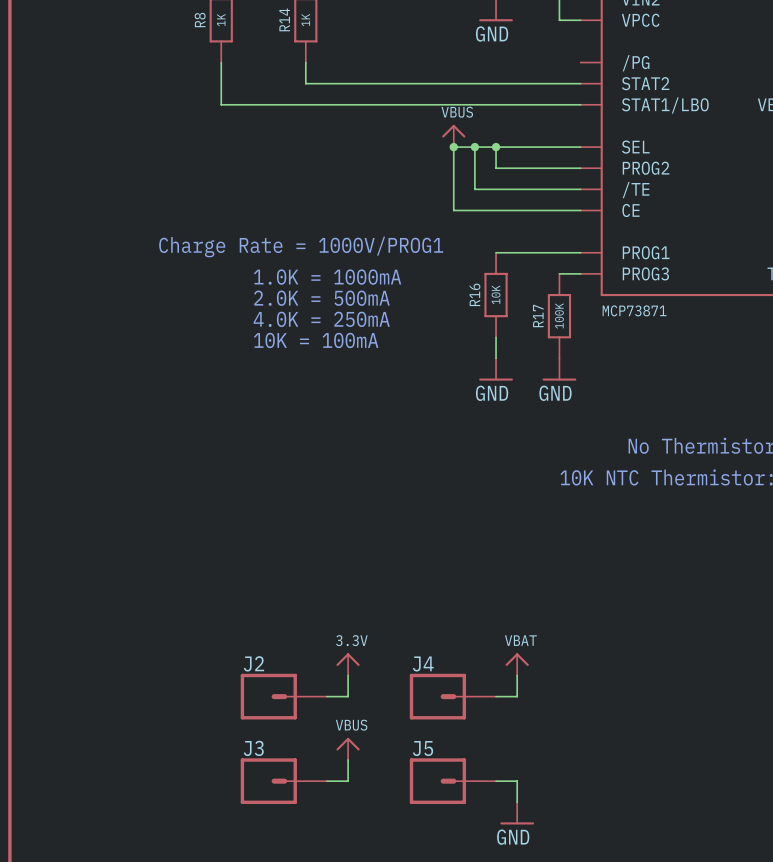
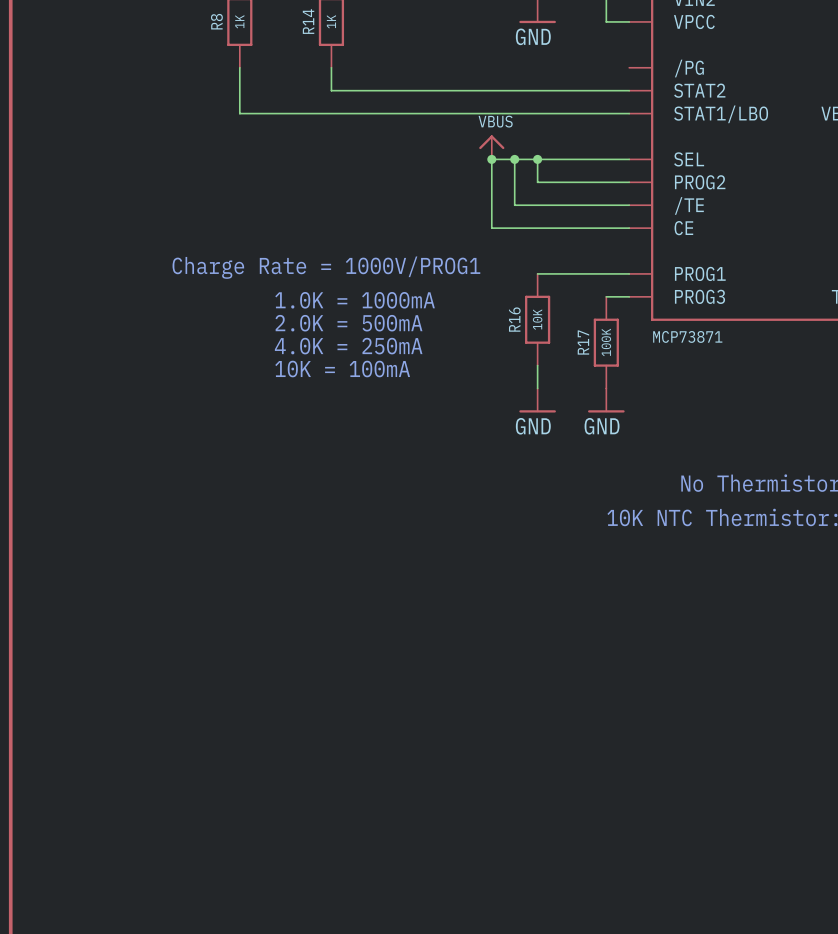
power symbol: 3.3V (348, 664) -> none
power symbol: VBAT (517, 664) -> none
wire: (348, 675) (348, 696) (326, 696) -> none
wire: (517, 675) (517, 696) (496, 696) -> none
J2: (283, 696) -> none
J4: (452, 696) -> none
power symbol: VBUS (348, 748) -> none
wire: (348, 760) (348, 781) (326, 781) -> none
J3: (283, 781) -> none
J5: (452, 781) -> none
wire: (496, 781) (517, 781) (517, 802) -> none
power symbol: GND (517, 813) -> none

